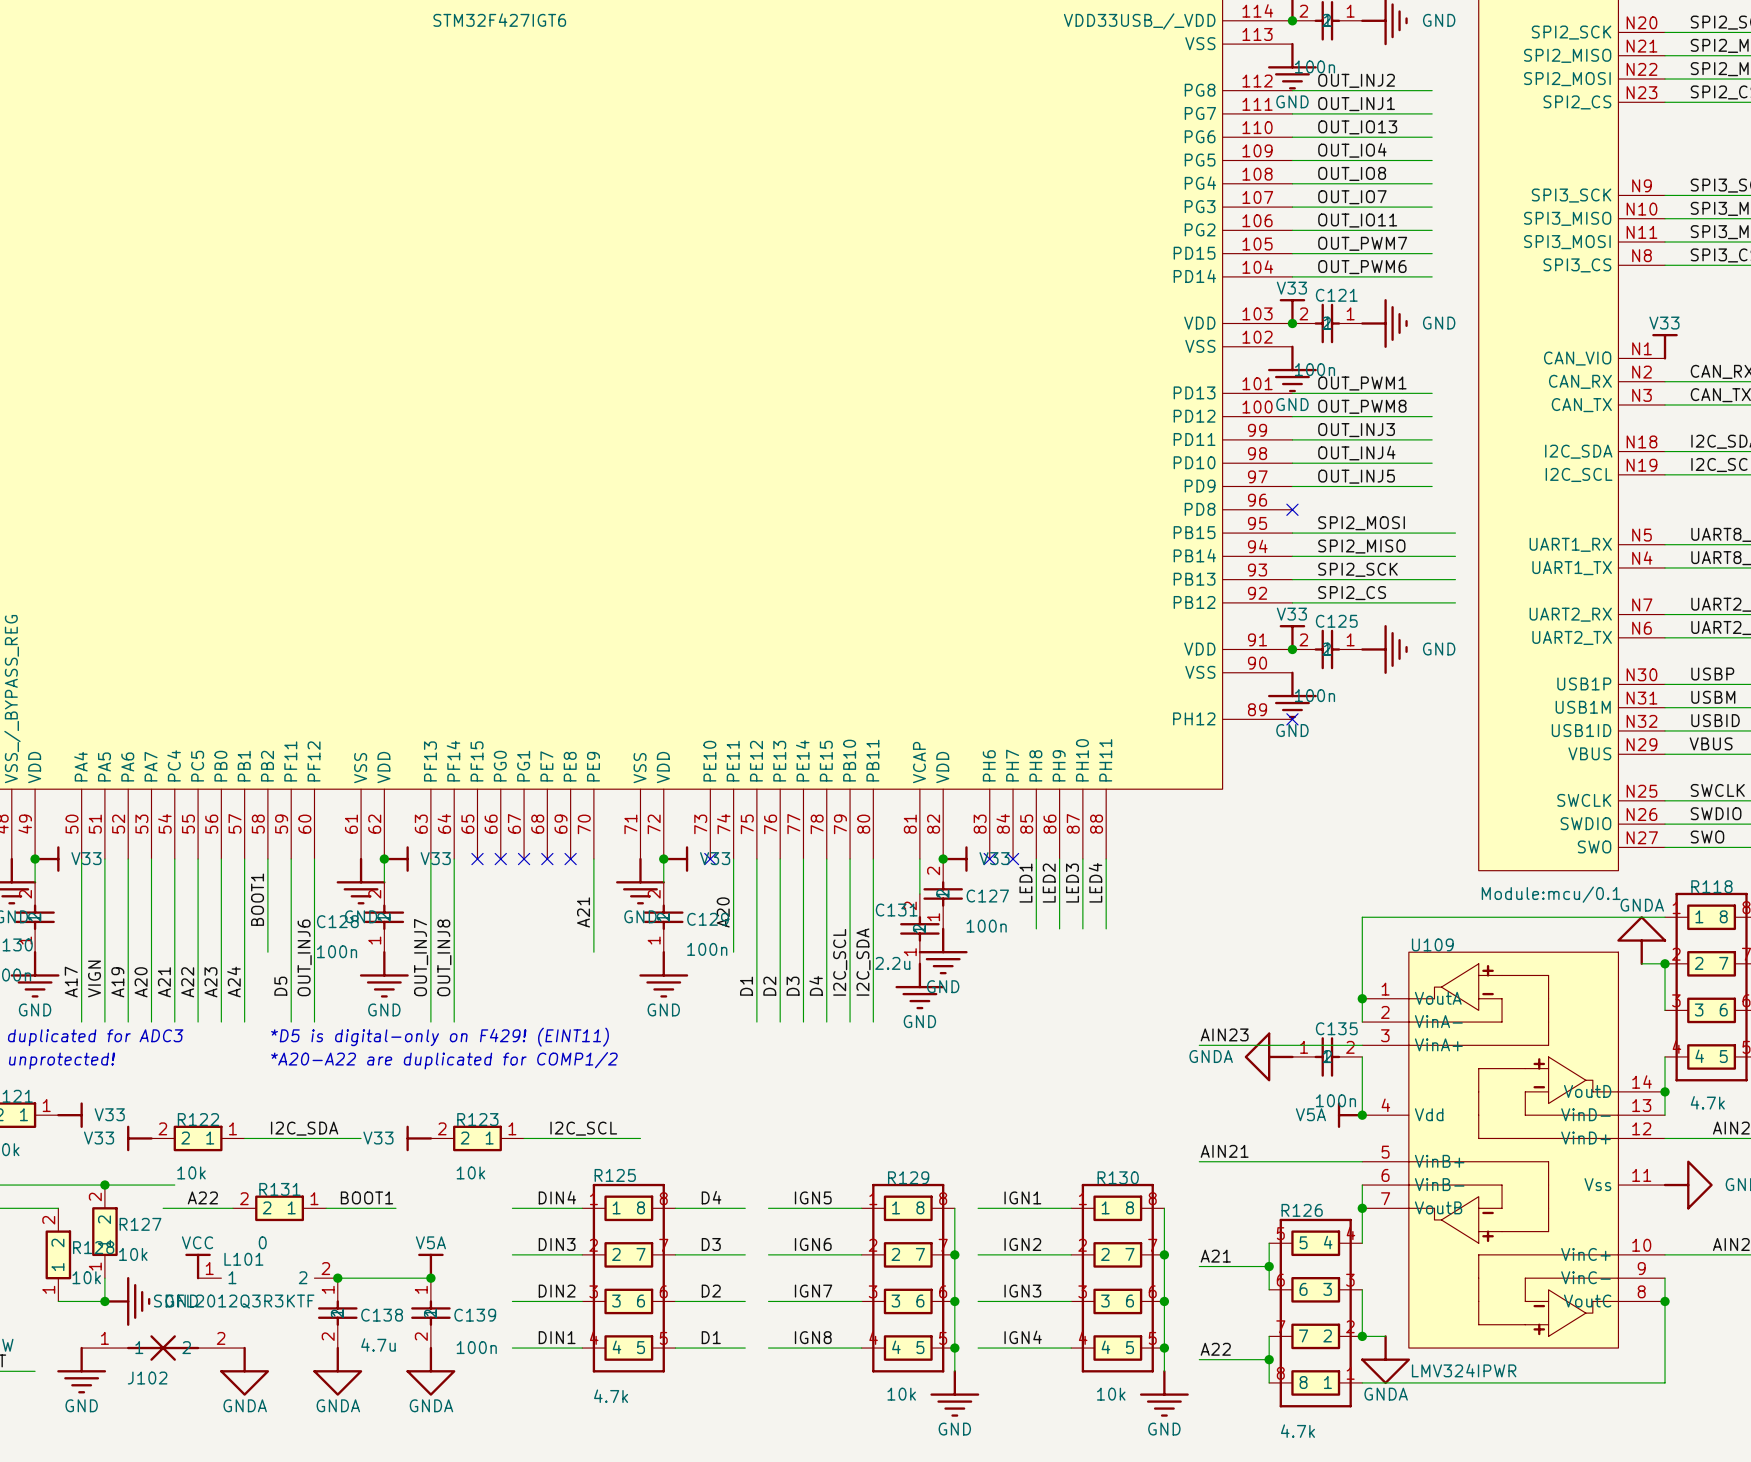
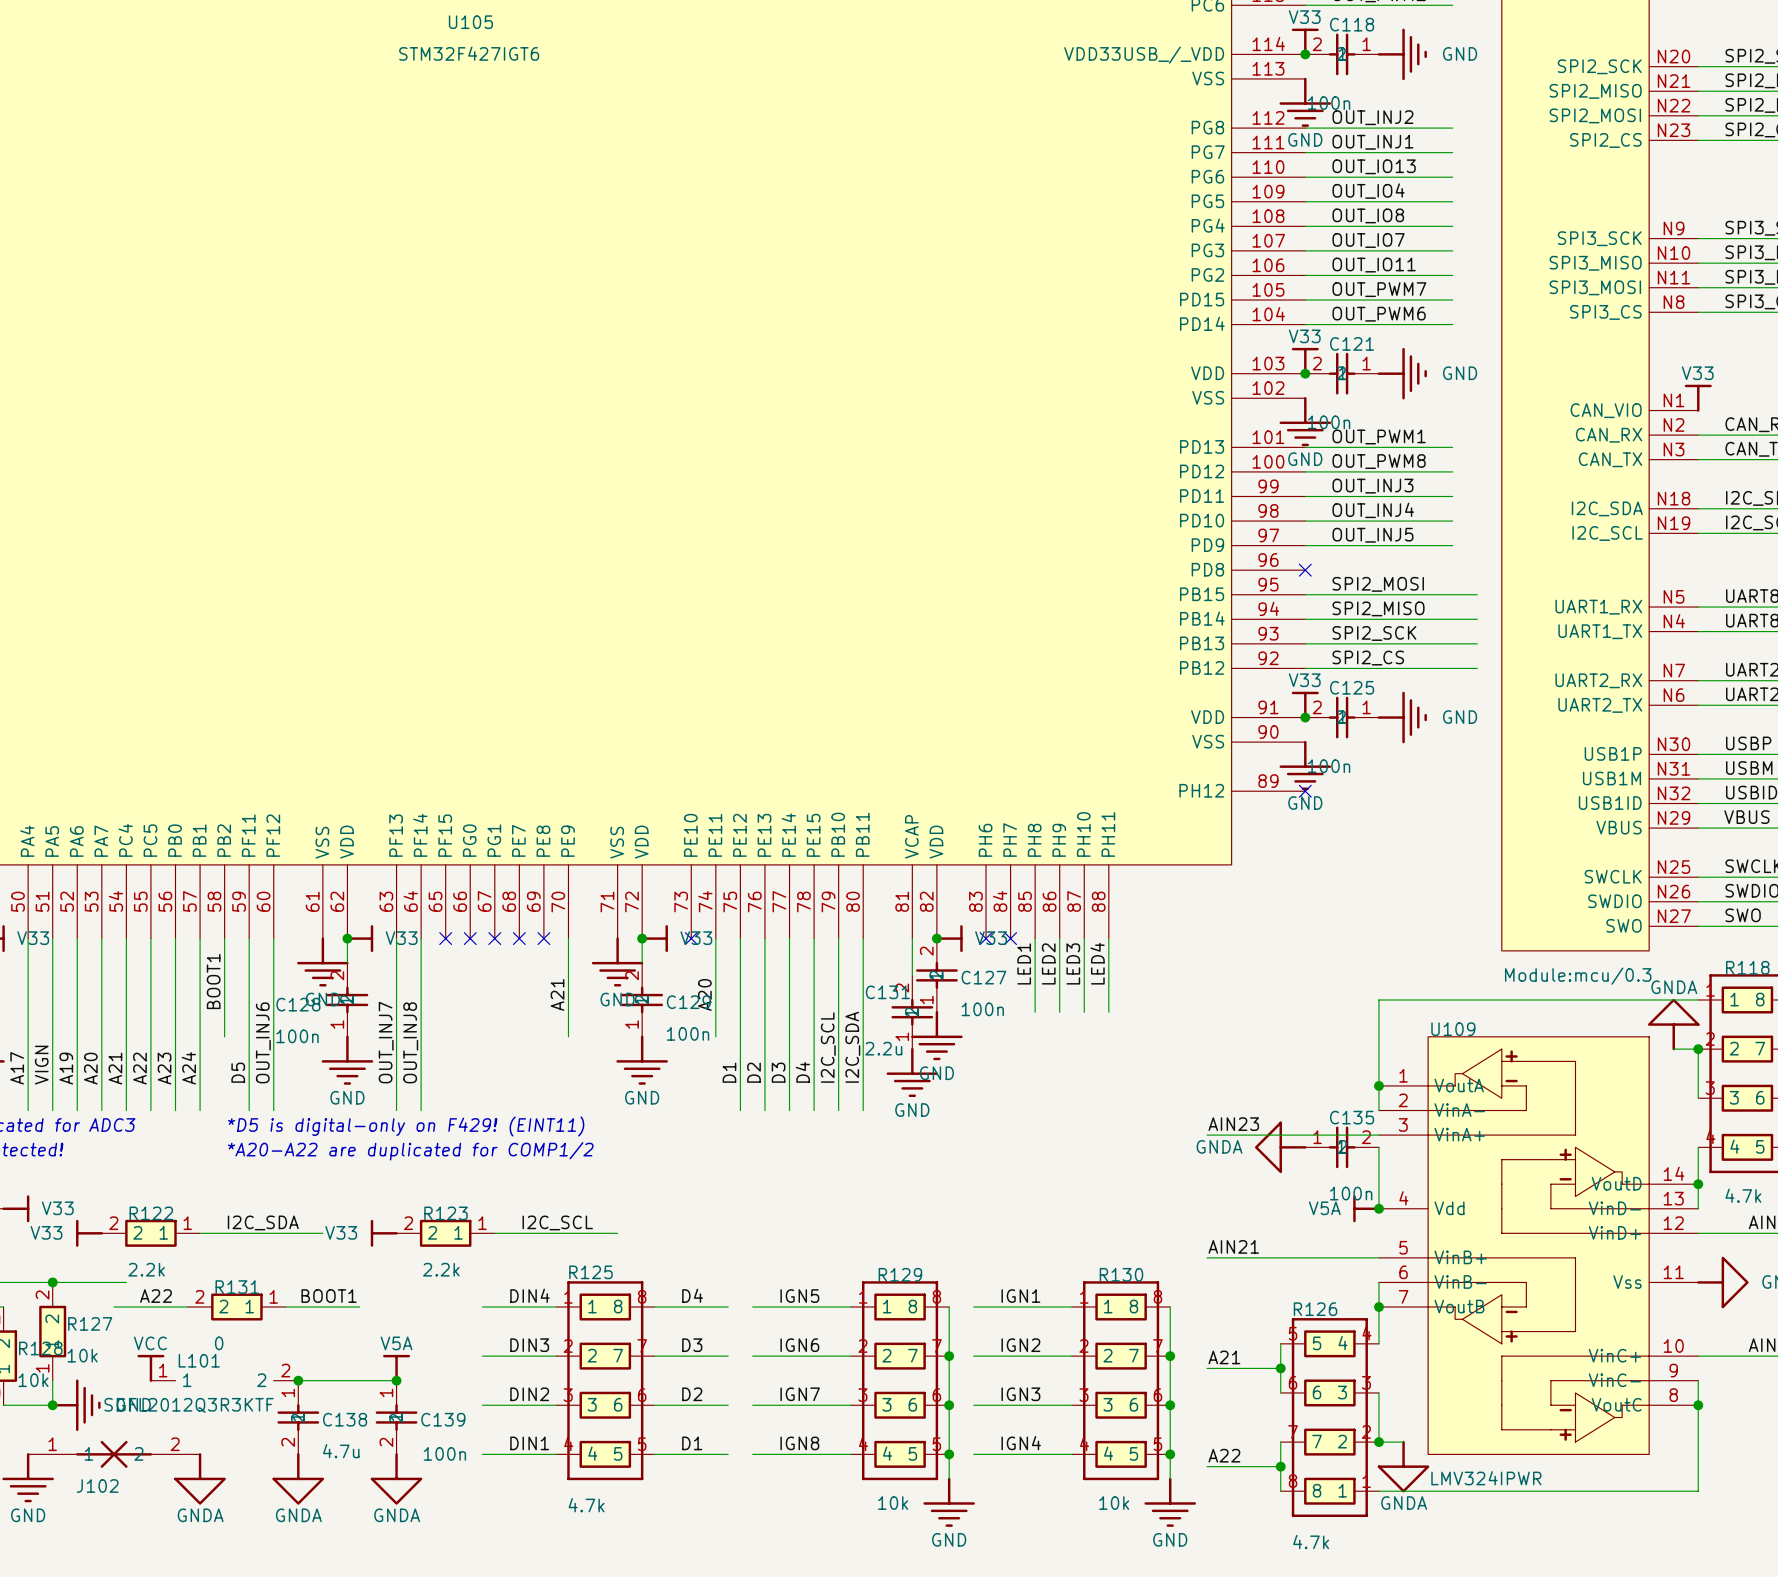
part value: Module:mcu/0.1 (1551, 894) -> Module:mcu/0.3 (1578, 976)
R122 value: 10k (191, 1172) -> 2.2k (146, 1269)
R123 value: 10k (470, 1172) -> 2.2k (441, 1269)

